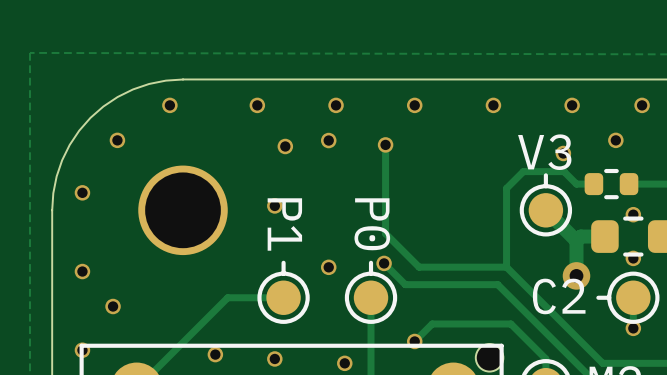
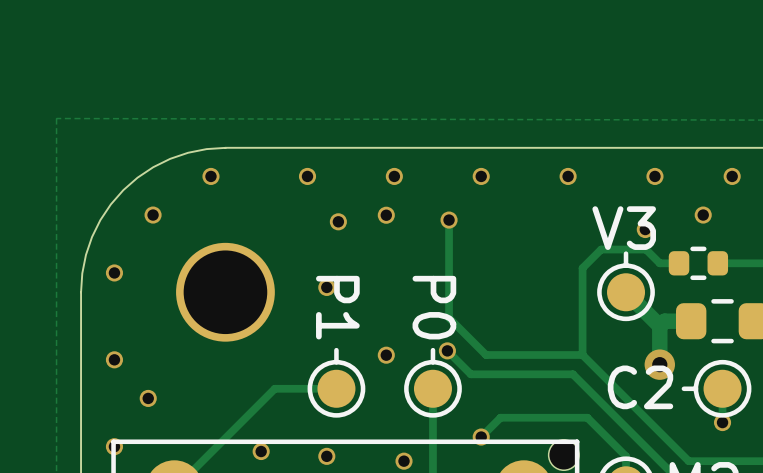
via: (633, 214) -> none
via: (633, 258) -> none

